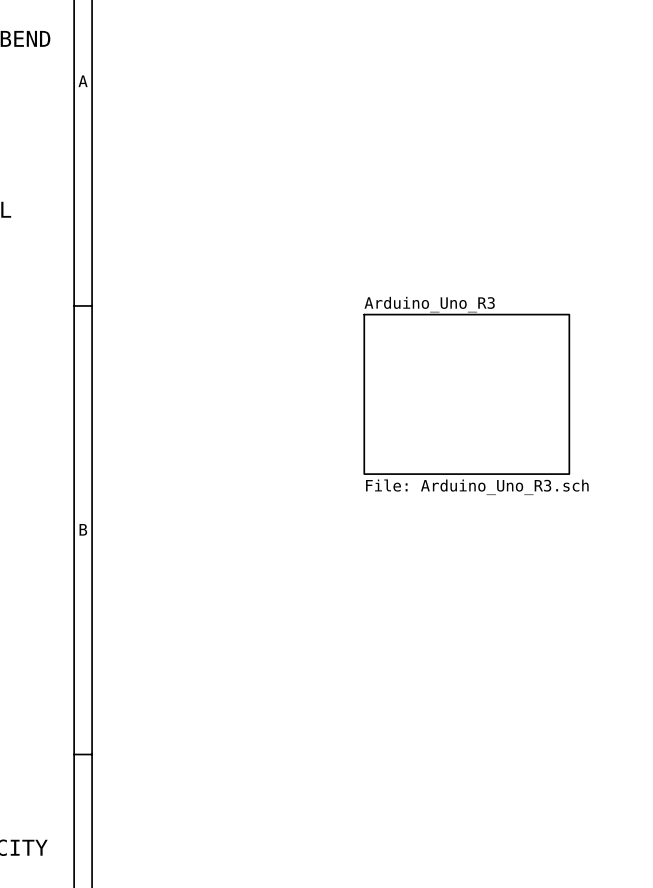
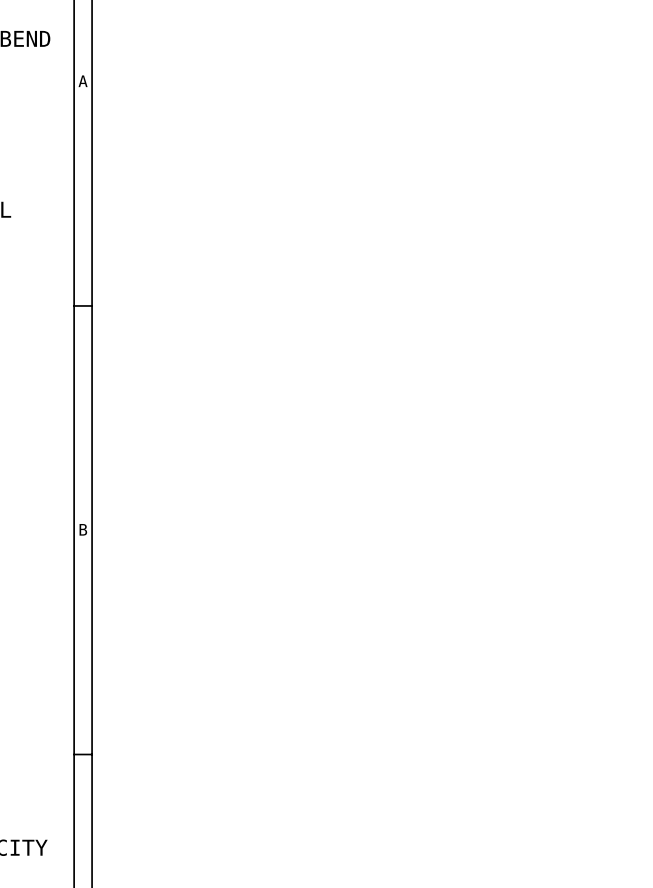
sheet Arduino_Uno_R3: File: Arduino_Uno_R3.sch (466, 394) -> none

